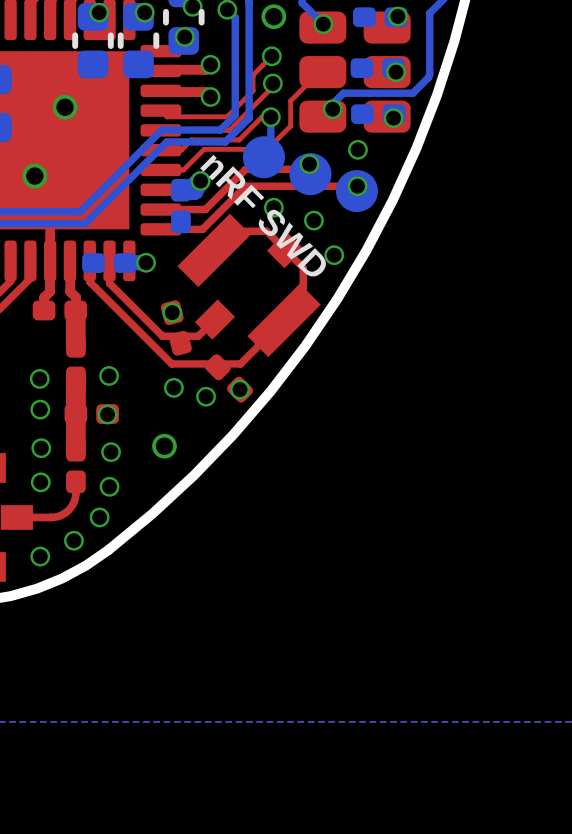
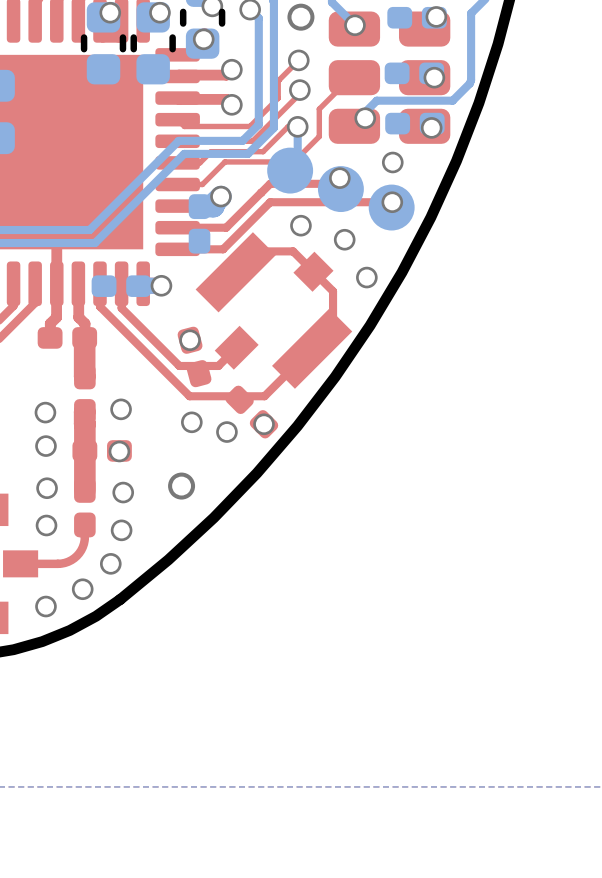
via: (65, 107) -> none
via: (34, 176) -> none
text: nRF SWD (263, 215) -> none

